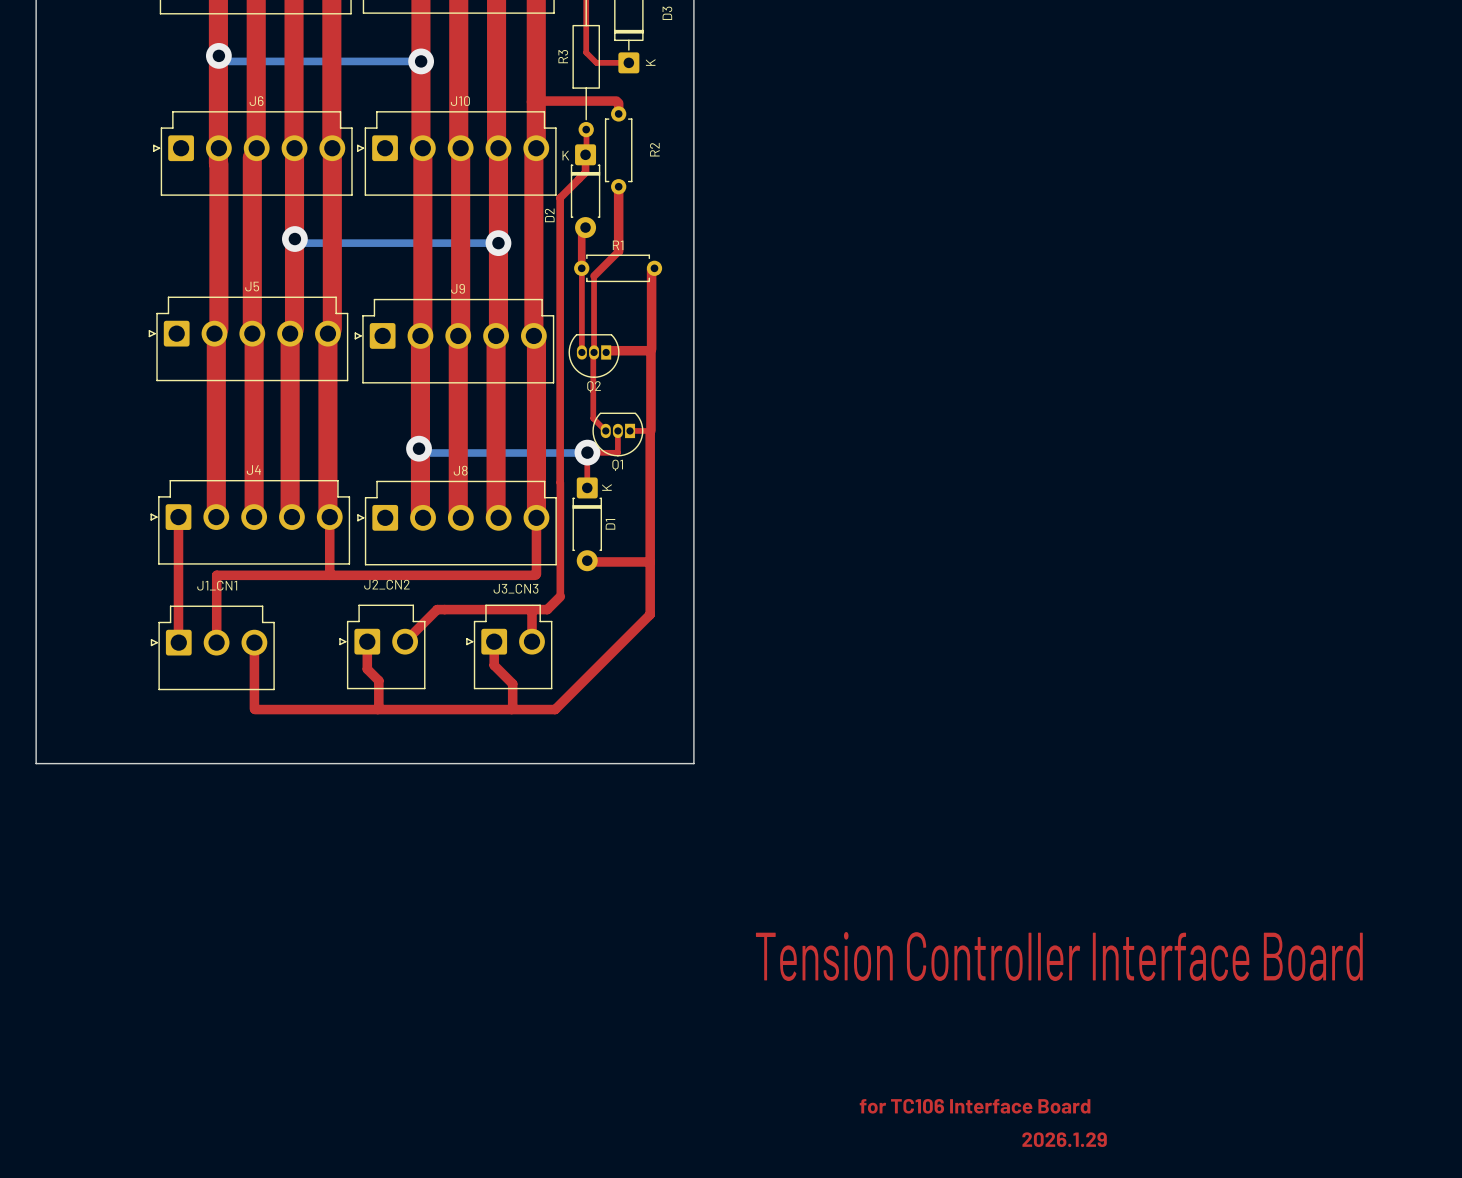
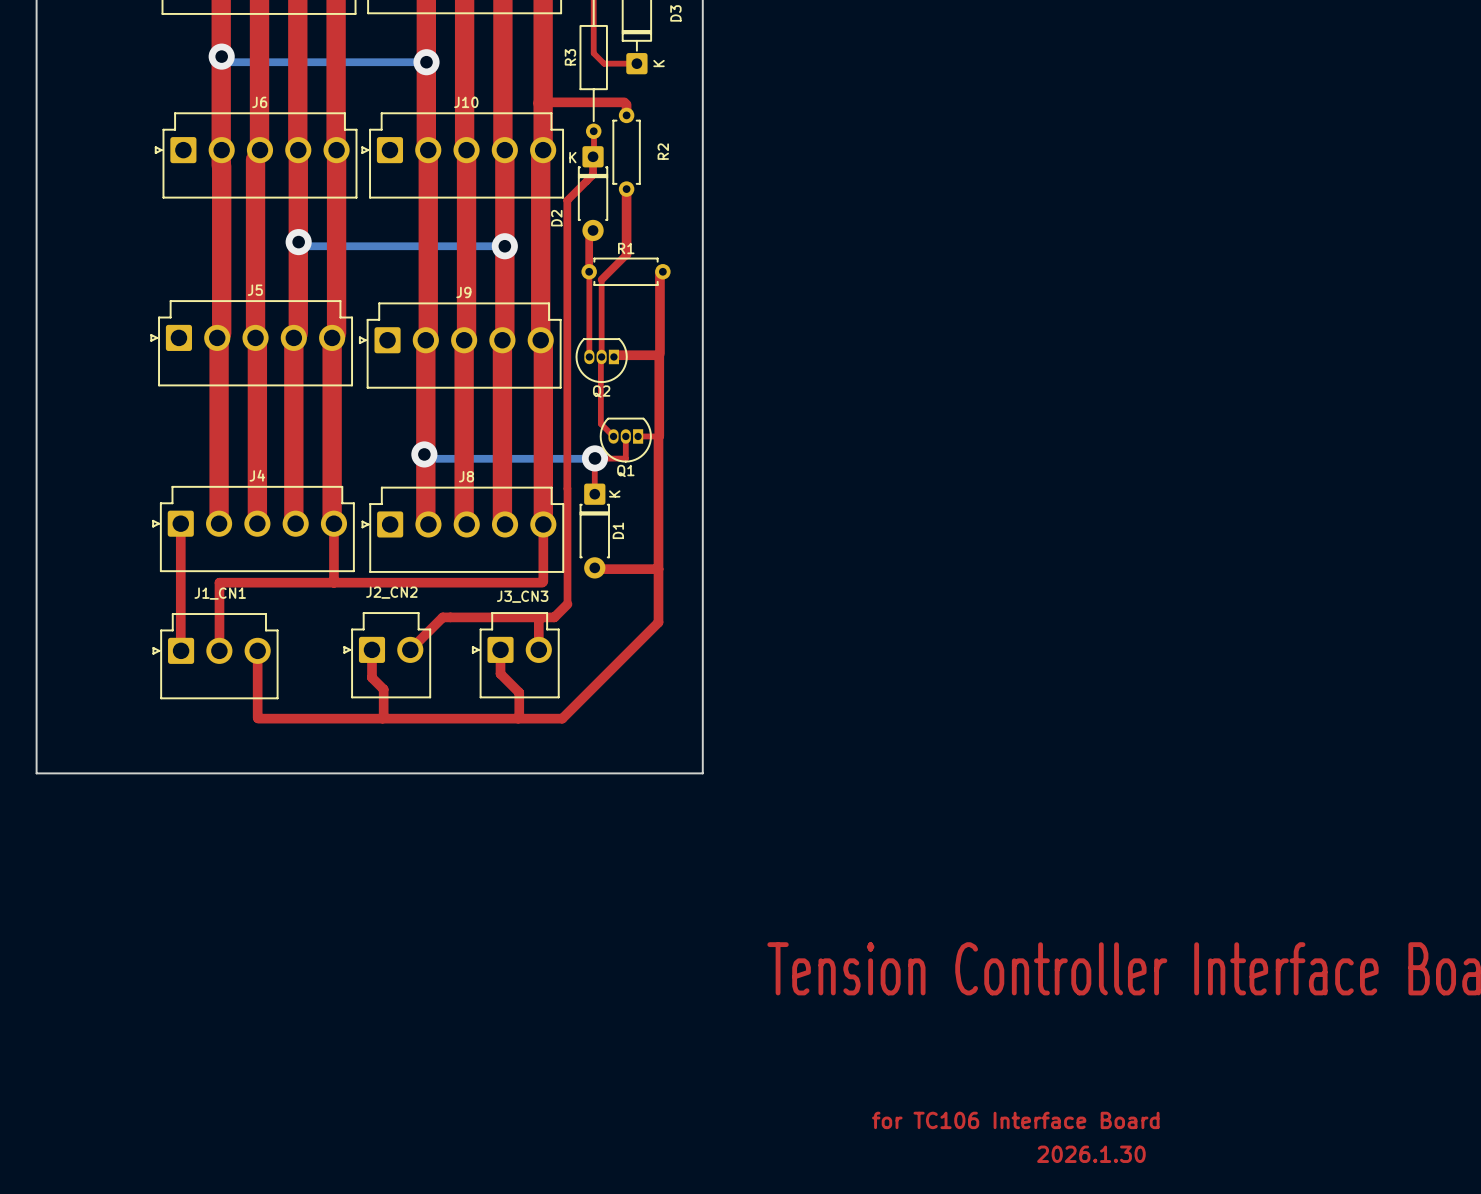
text: 2026.1.29 (1064, 1139) -> 2026.1.30 (1091, 1154)

